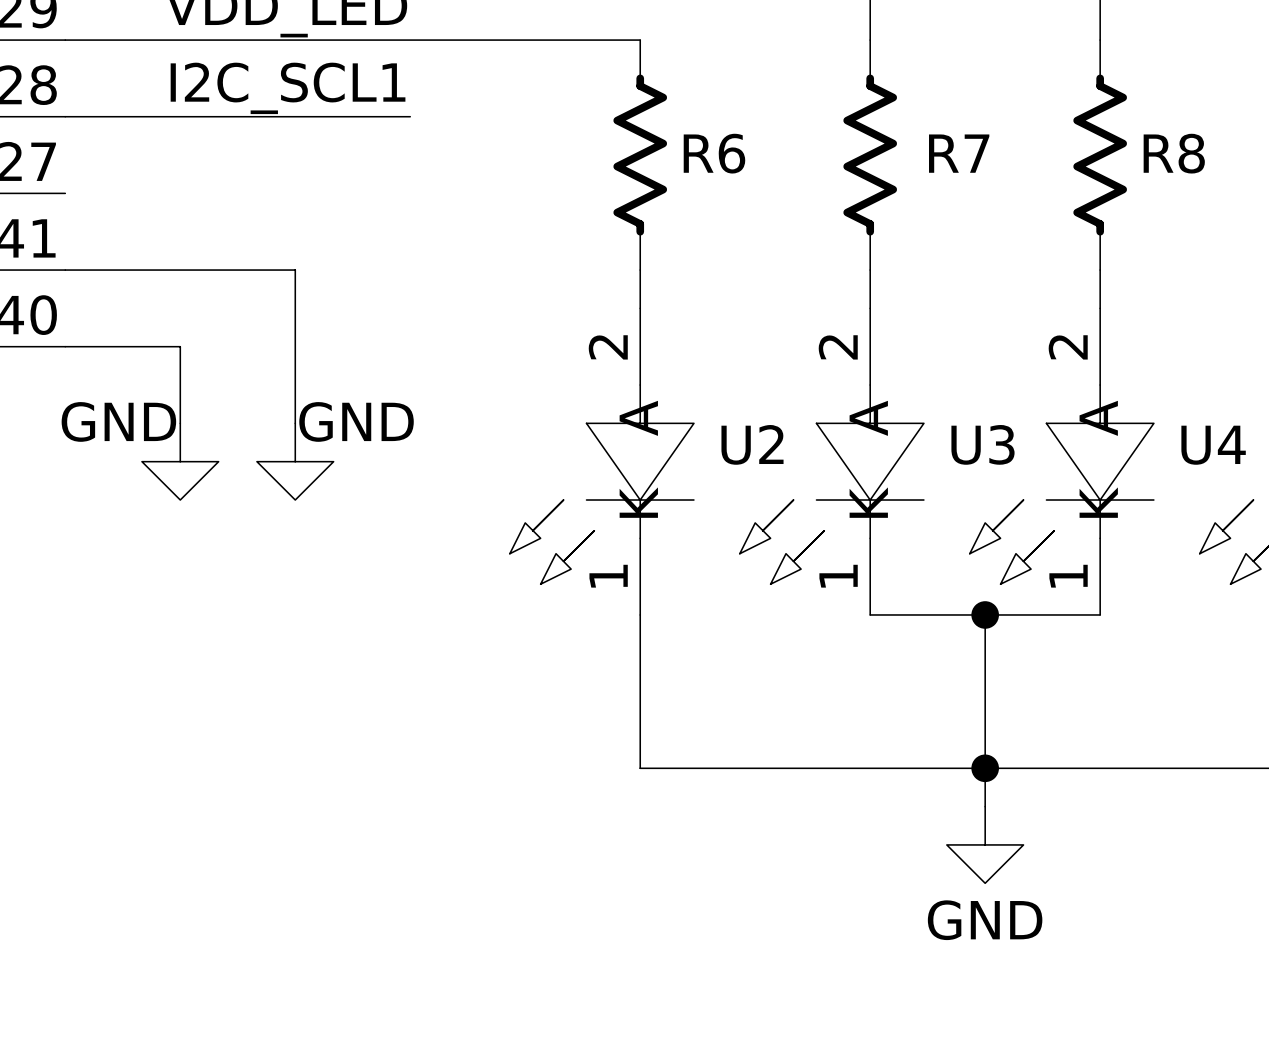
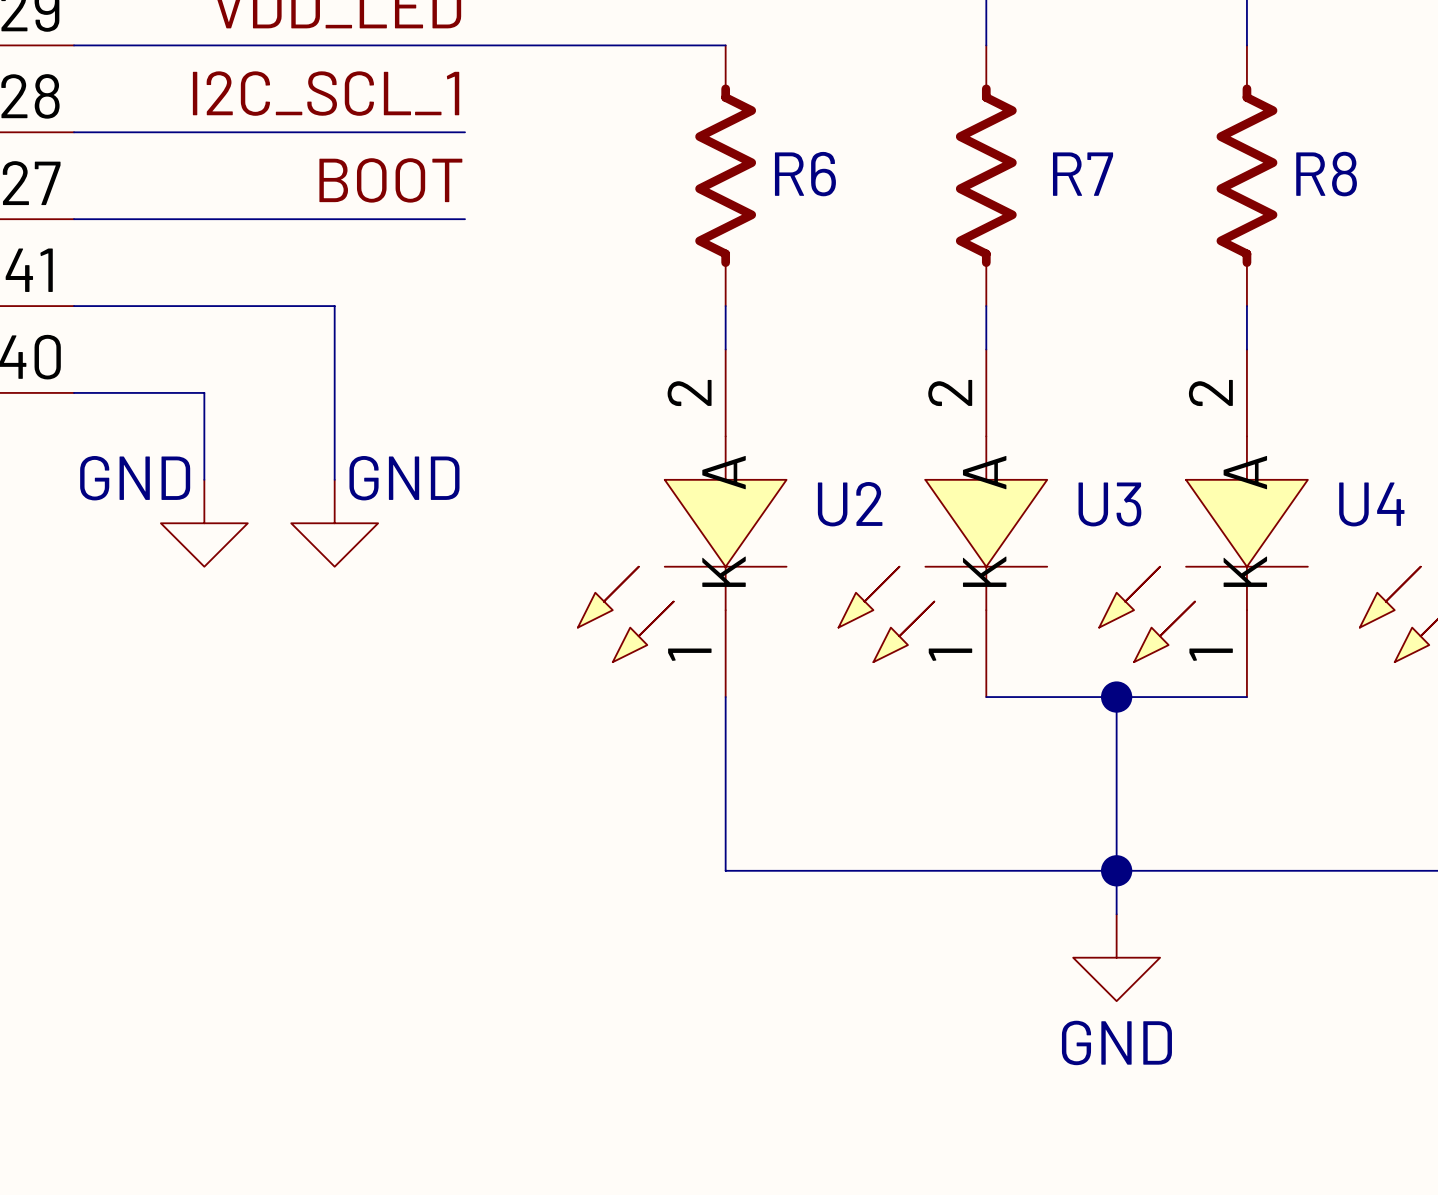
label: I2C_SCL1 (288, 88) -> I2C_SCL_1 (326, 93)
label: none -> BOOT (390, 180)
wire: none -> (74, 219) (465, 219)

